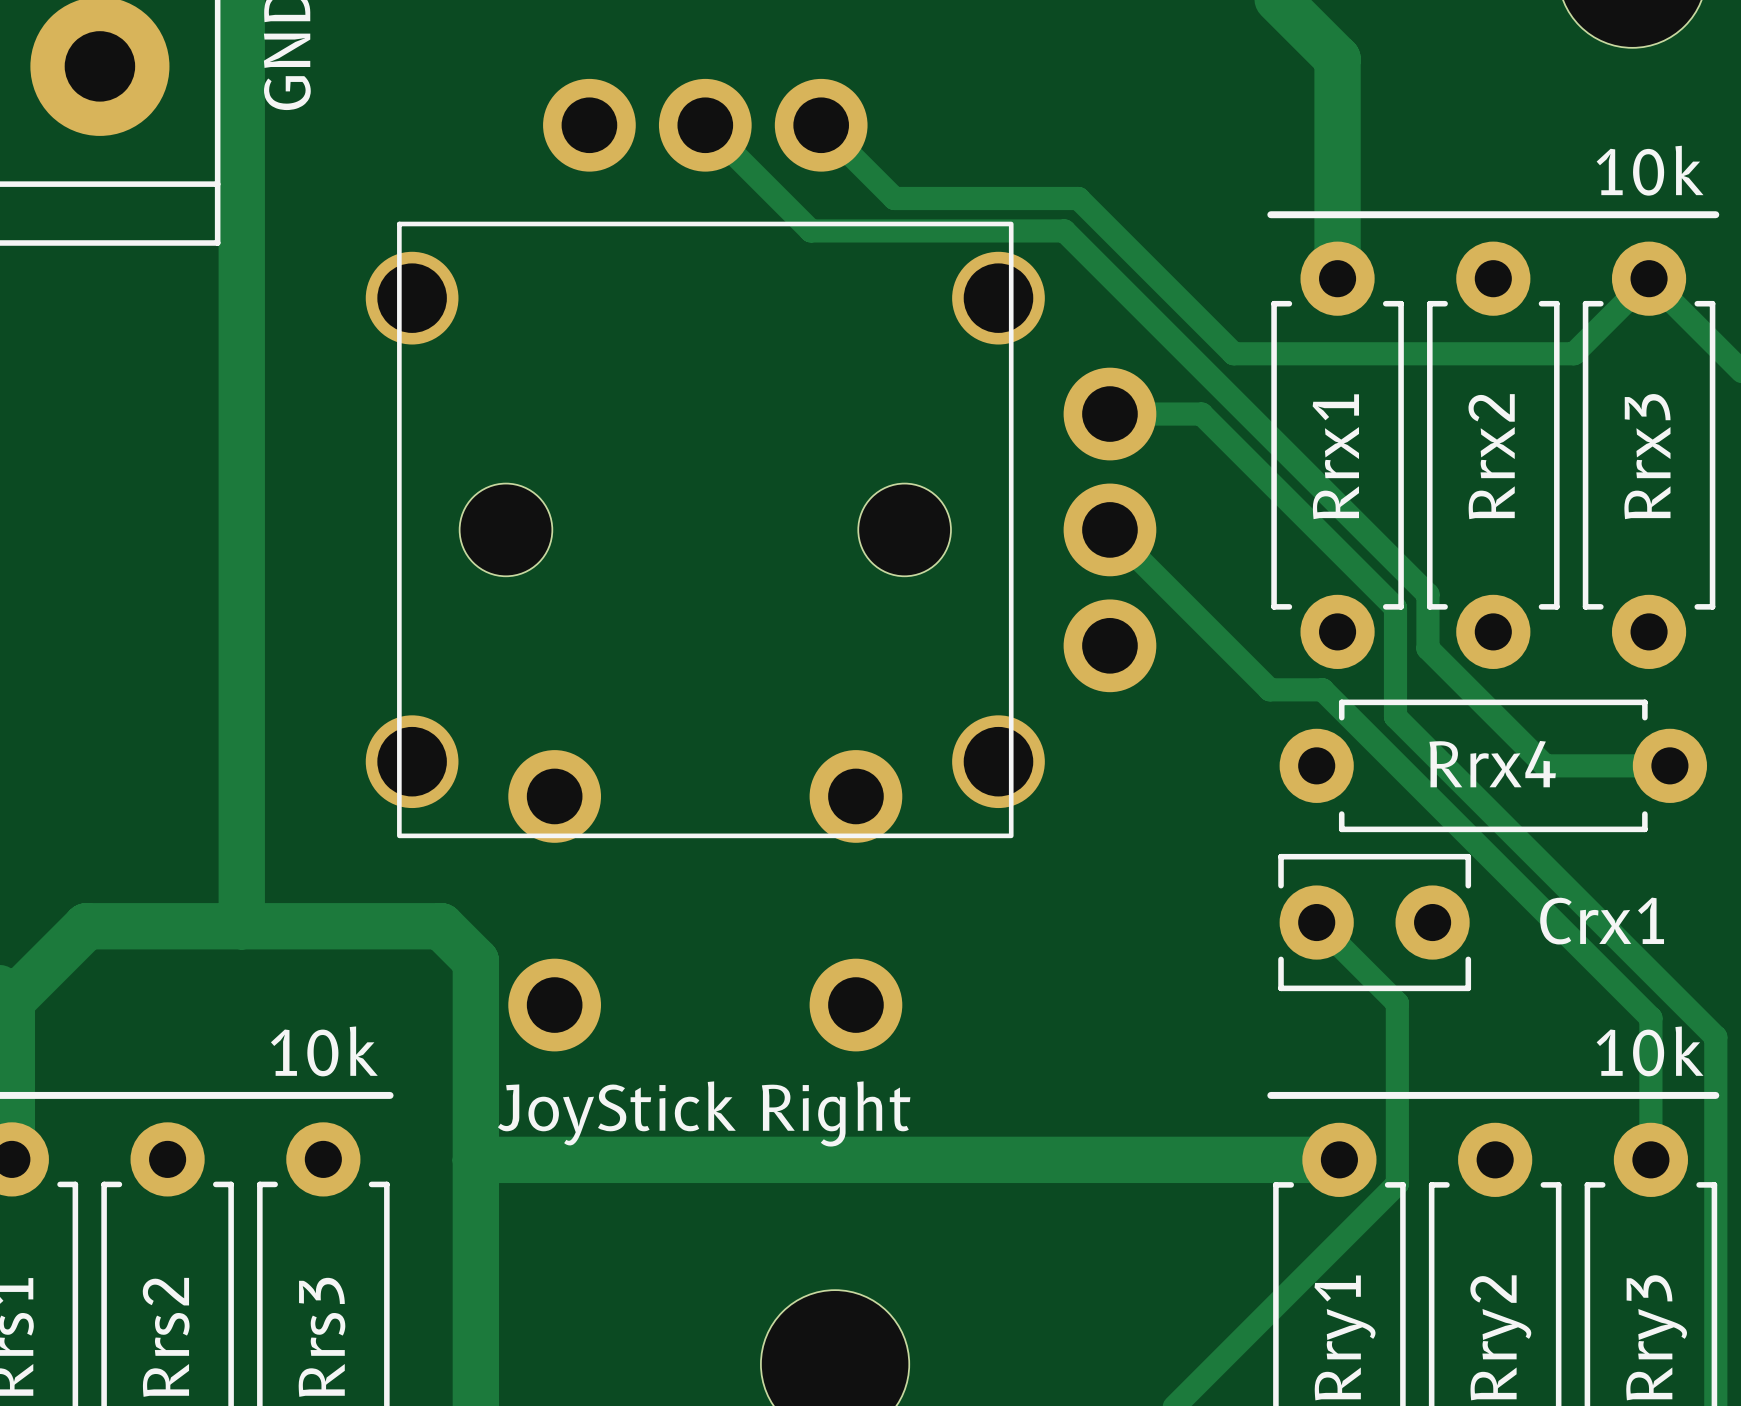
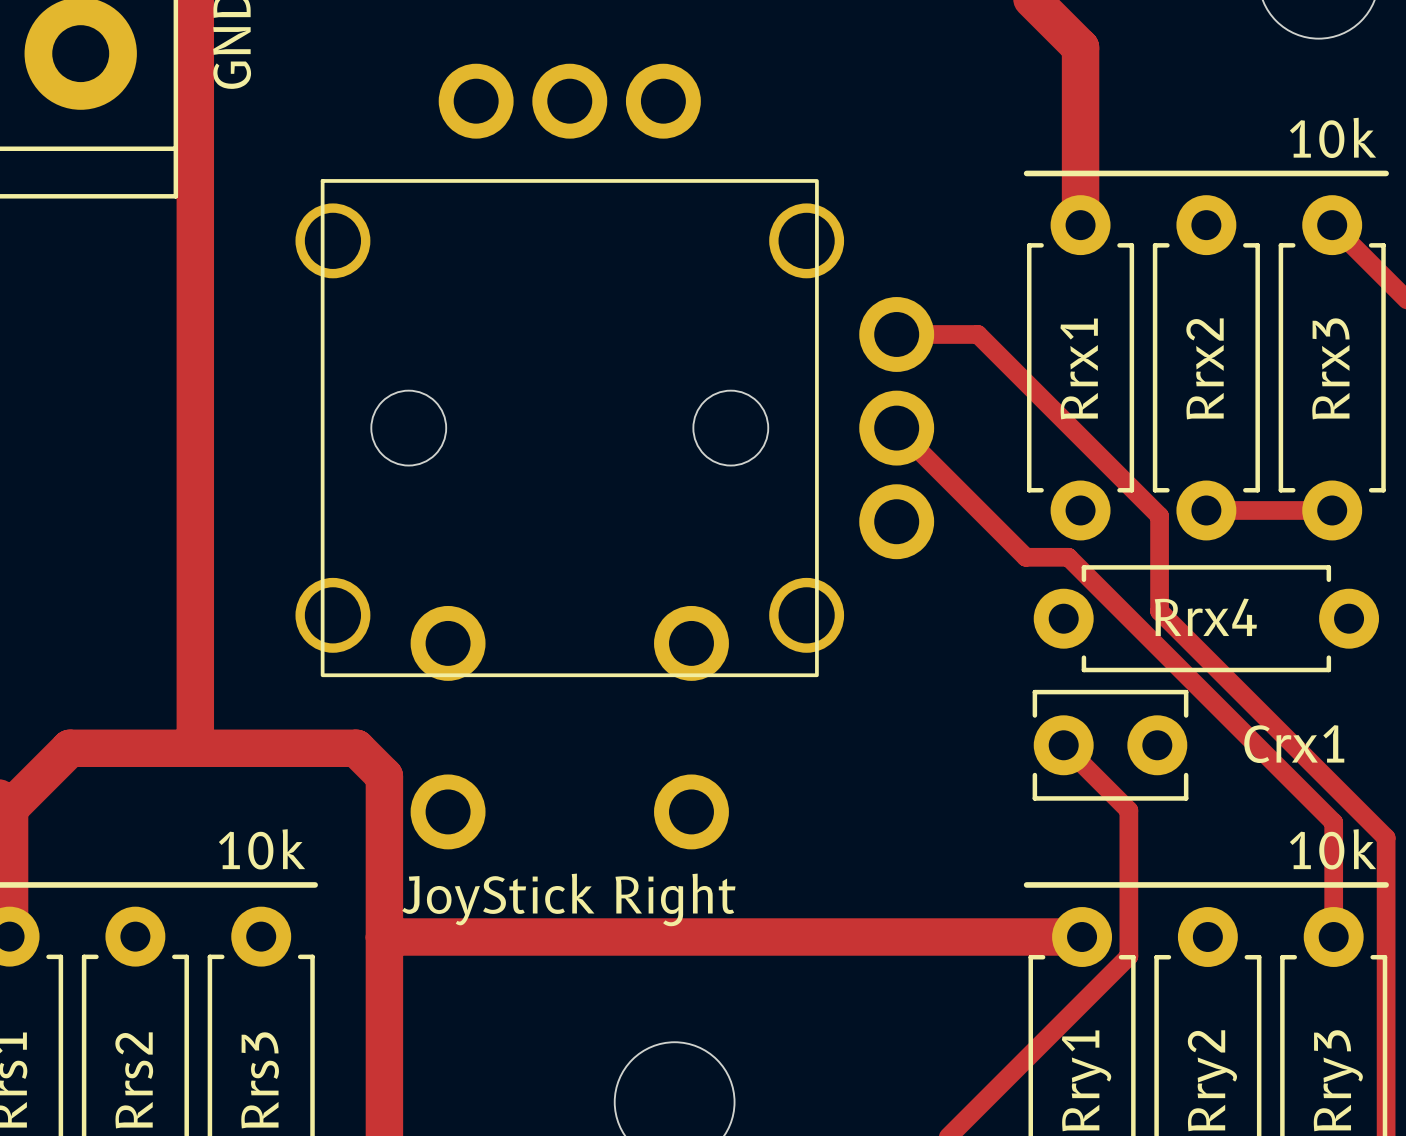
track: (705, 125) (810, 230) (1064, 230) (1427, 594) (1427, 648) (1545, 765) (1669, 765) -> none
track: (821, 125) (894, 198) (1078, 198) (1233, 353) (1573, 353) (1649, 278) -> none
track: (1201, 414) (1395, 607) (1395, 716) (1435, 756) -> (970, 334) (977, 334) (1159, 516) (1159, 611)
track: none -> (1206, 510) (1332, 510)

